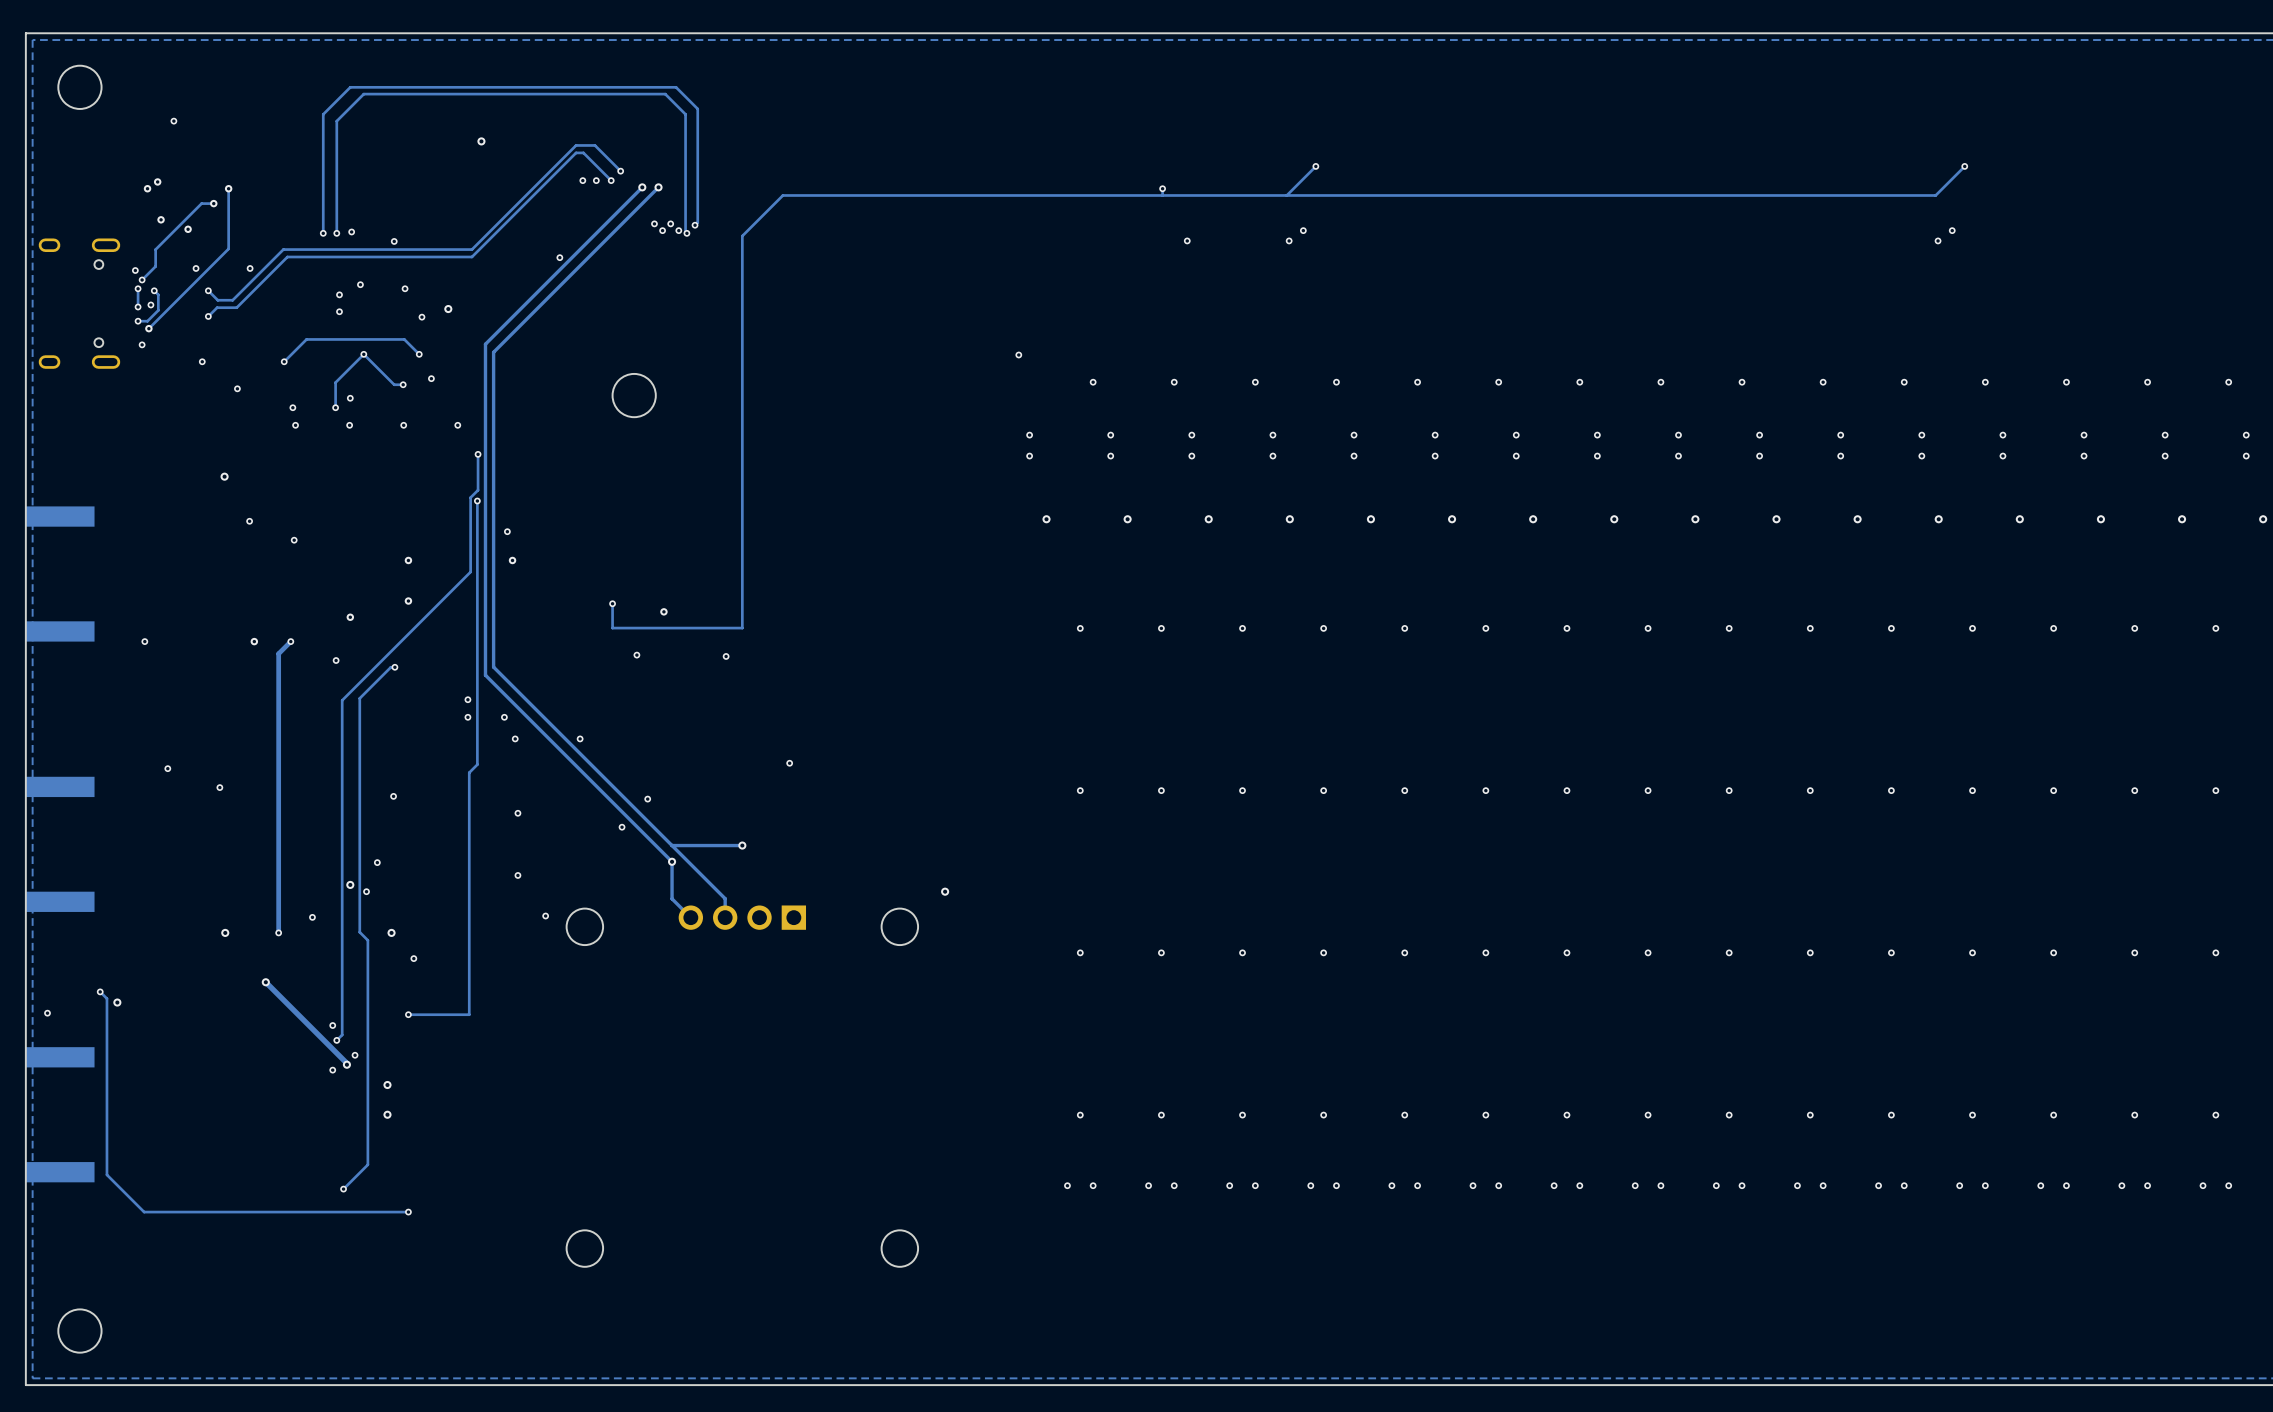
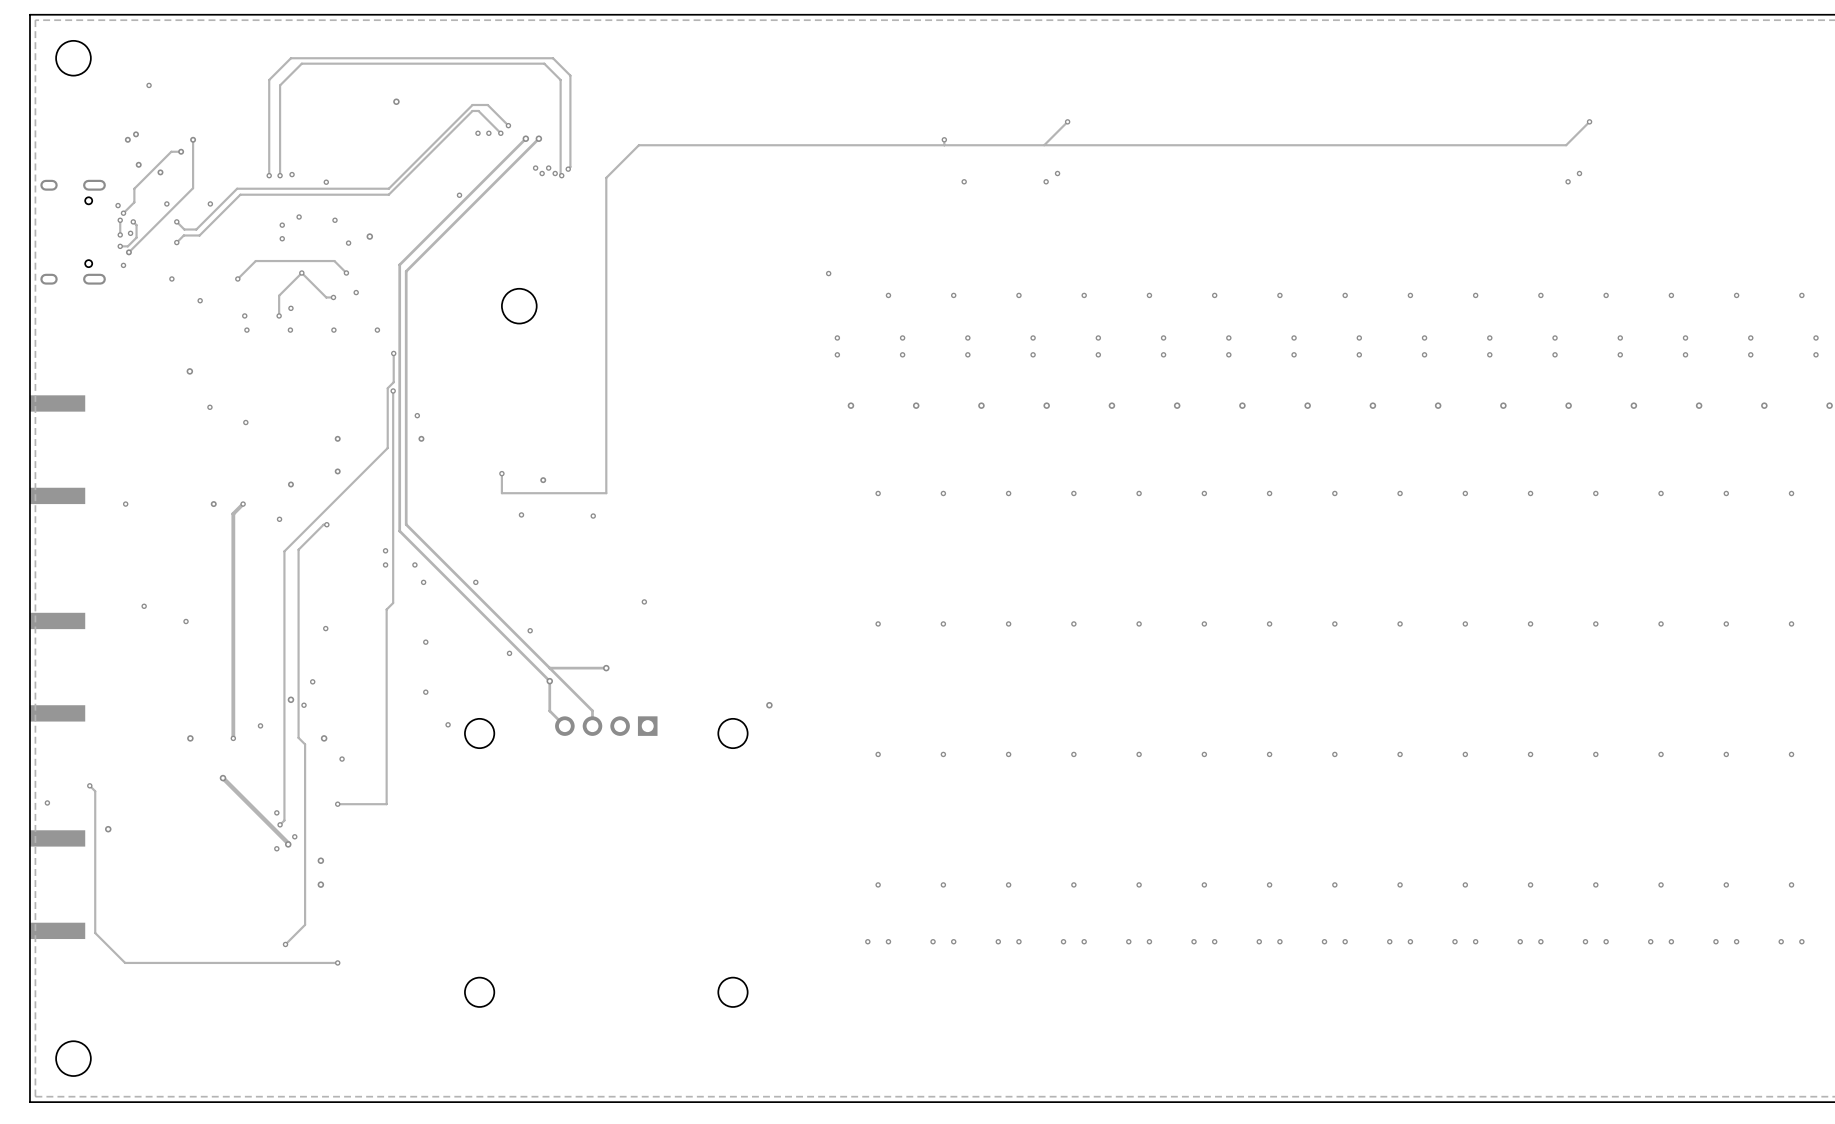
via position: (117, 1002) -> (108, 829)

